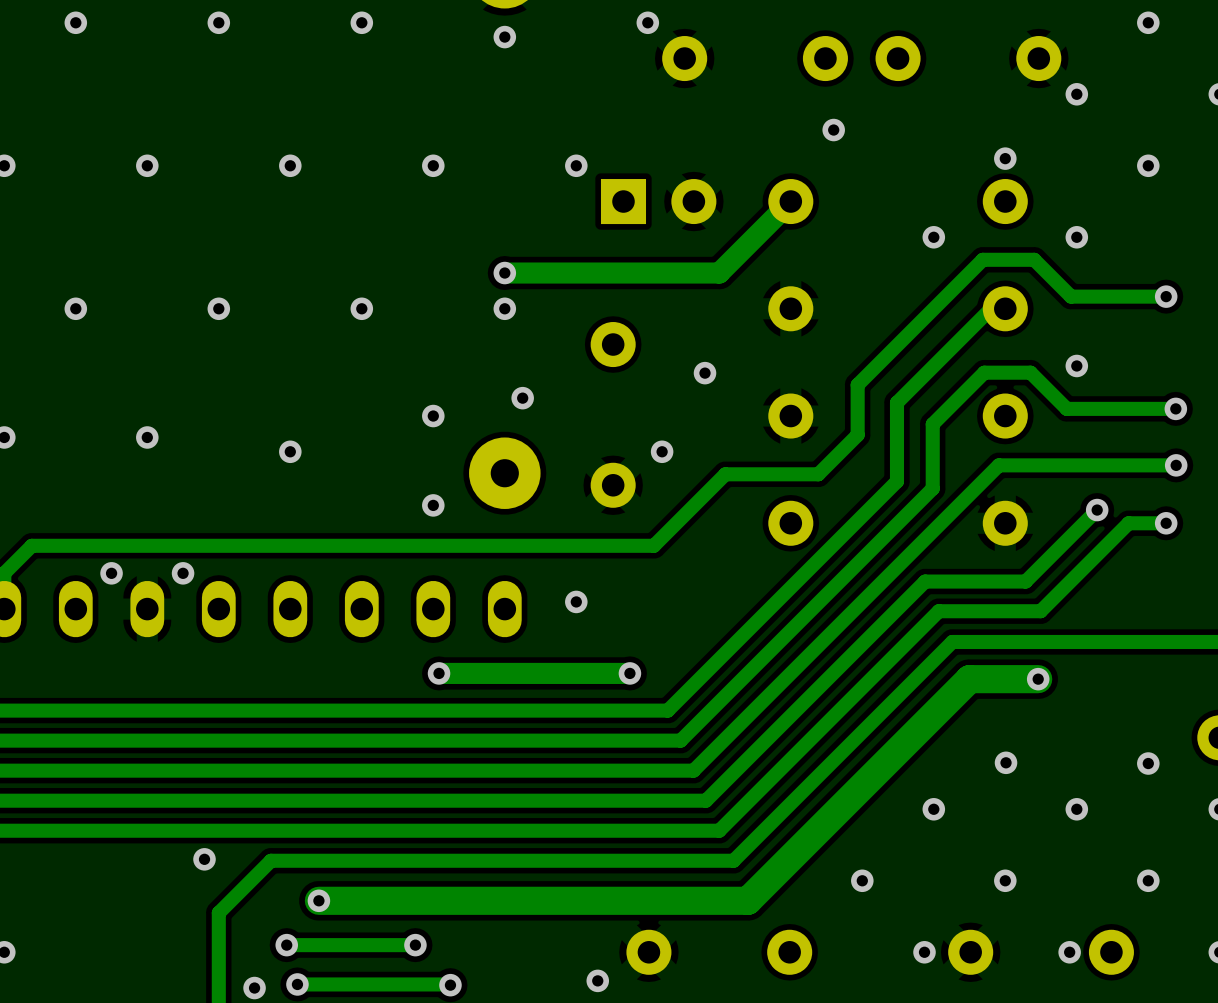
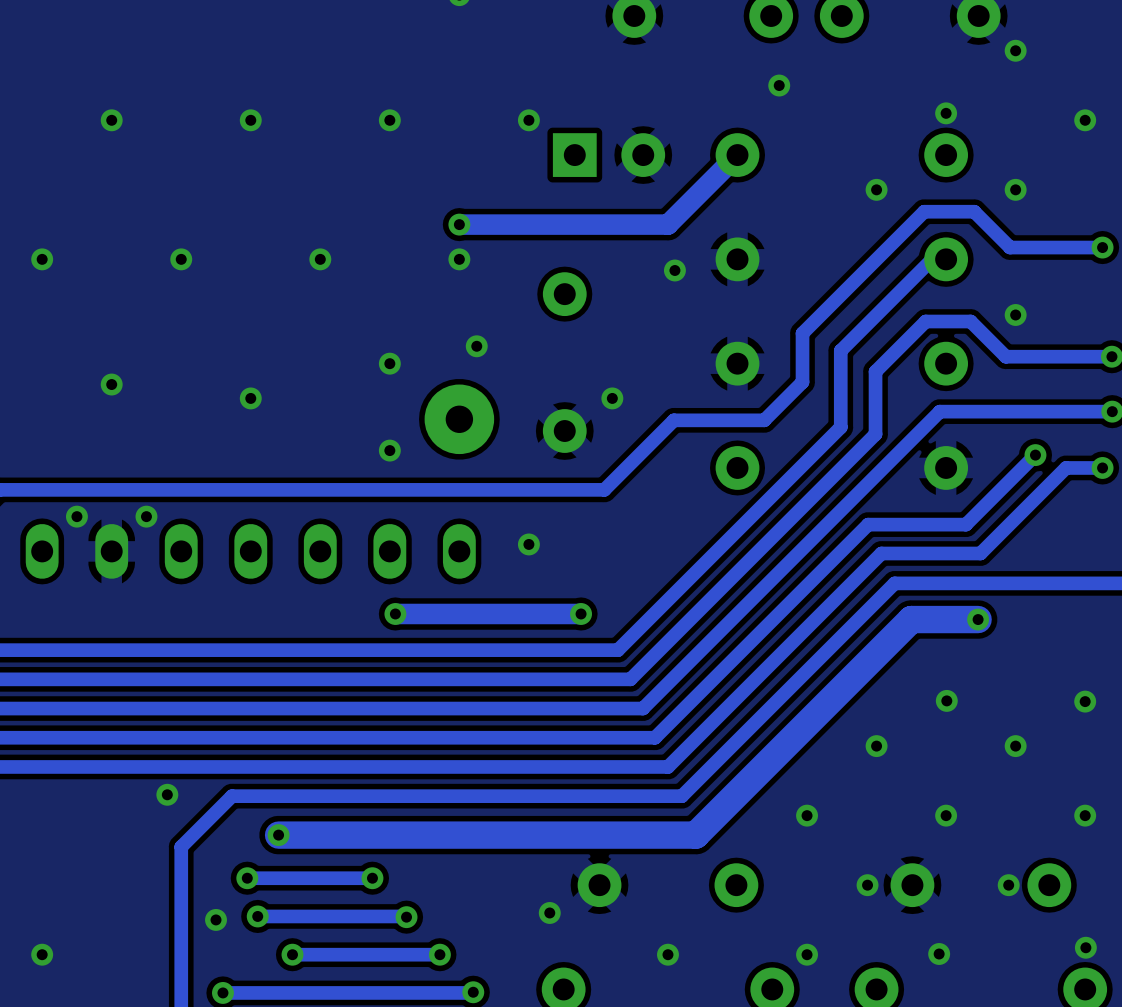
via position: (705, 373) -> (674, 270)

